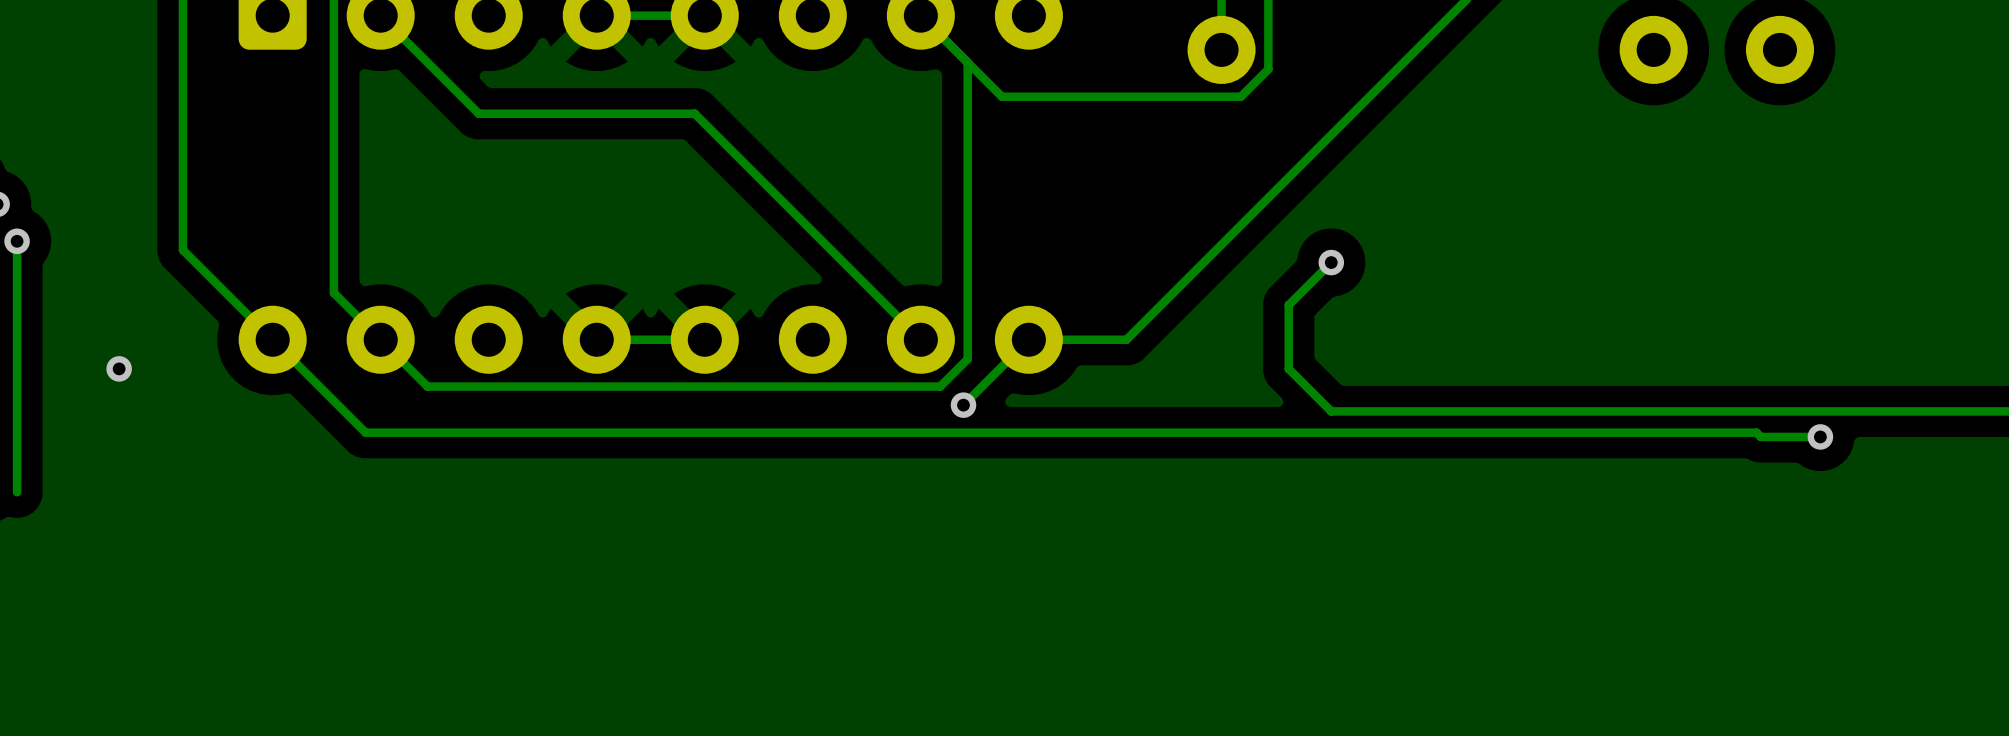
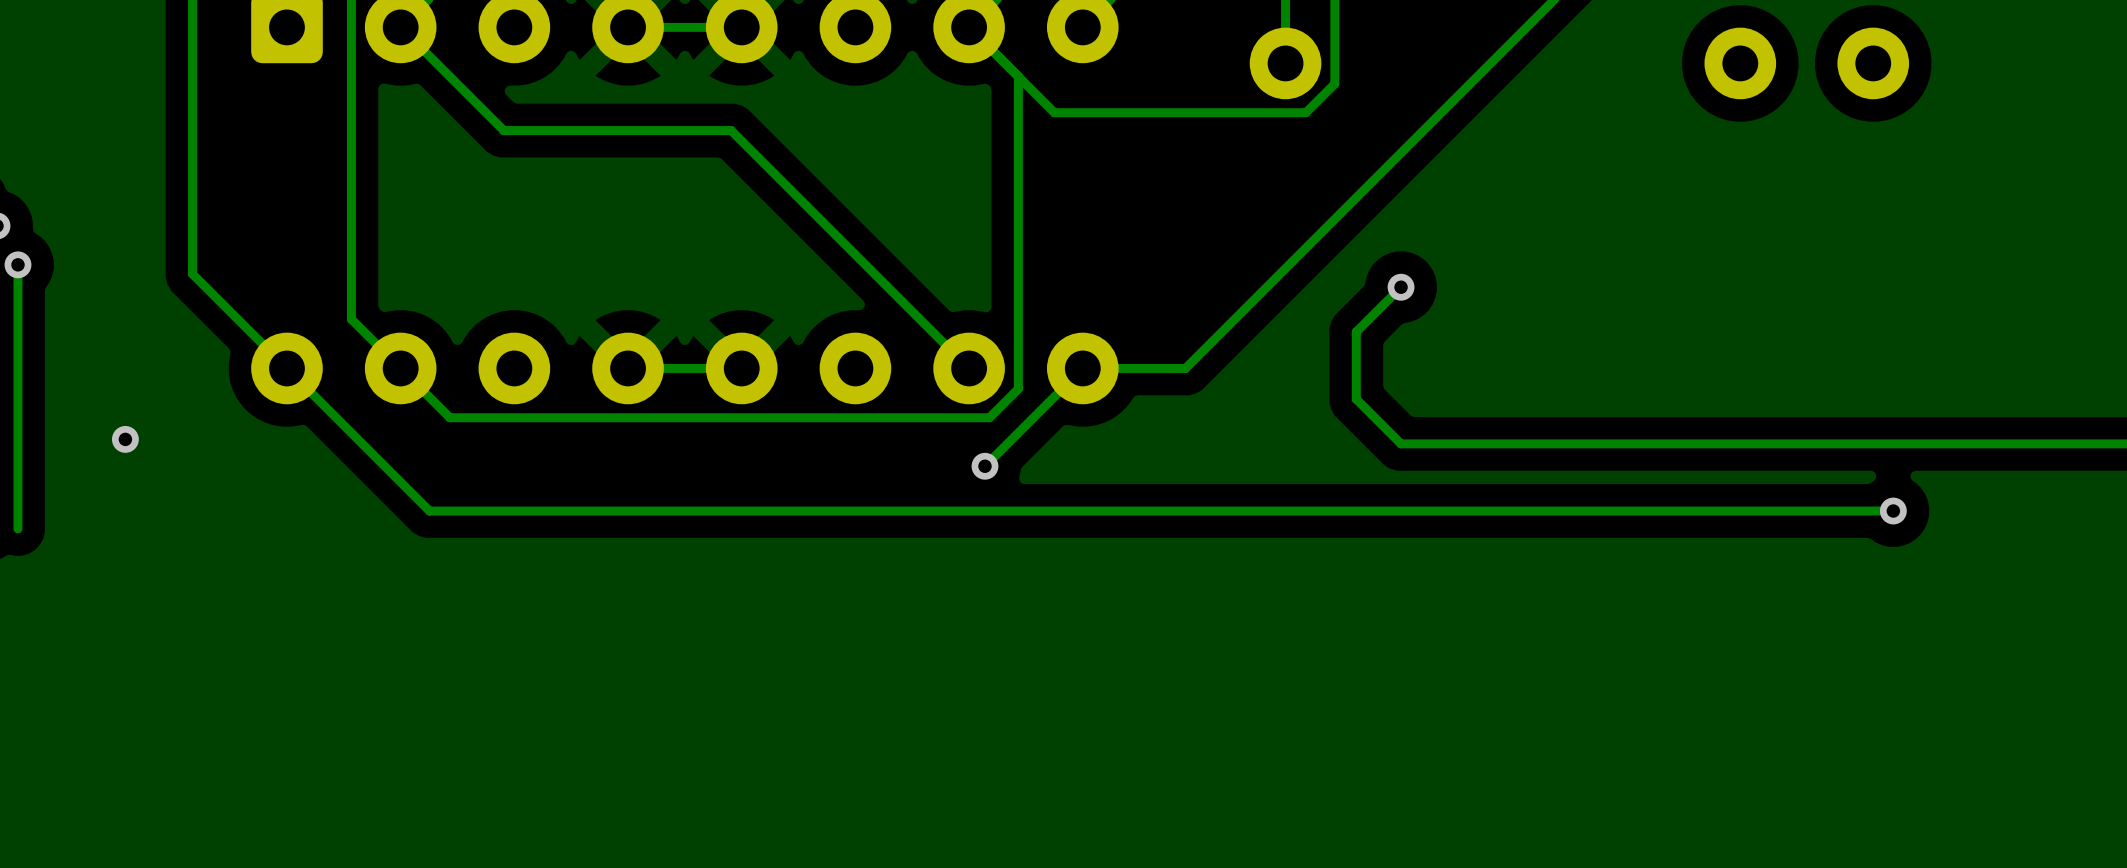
via position: (119, 368) -> (125, 439)
track: none -> (1013, 437) (985, 466)
via position: (963, 405) -> (985, 466)
track: (365, 432) (1756, 432) (1760, 436) (1820, 436) -> (384, 466) (429, 511) (1893, 511)
via position: (1820, 436) -> (1893, 511)

